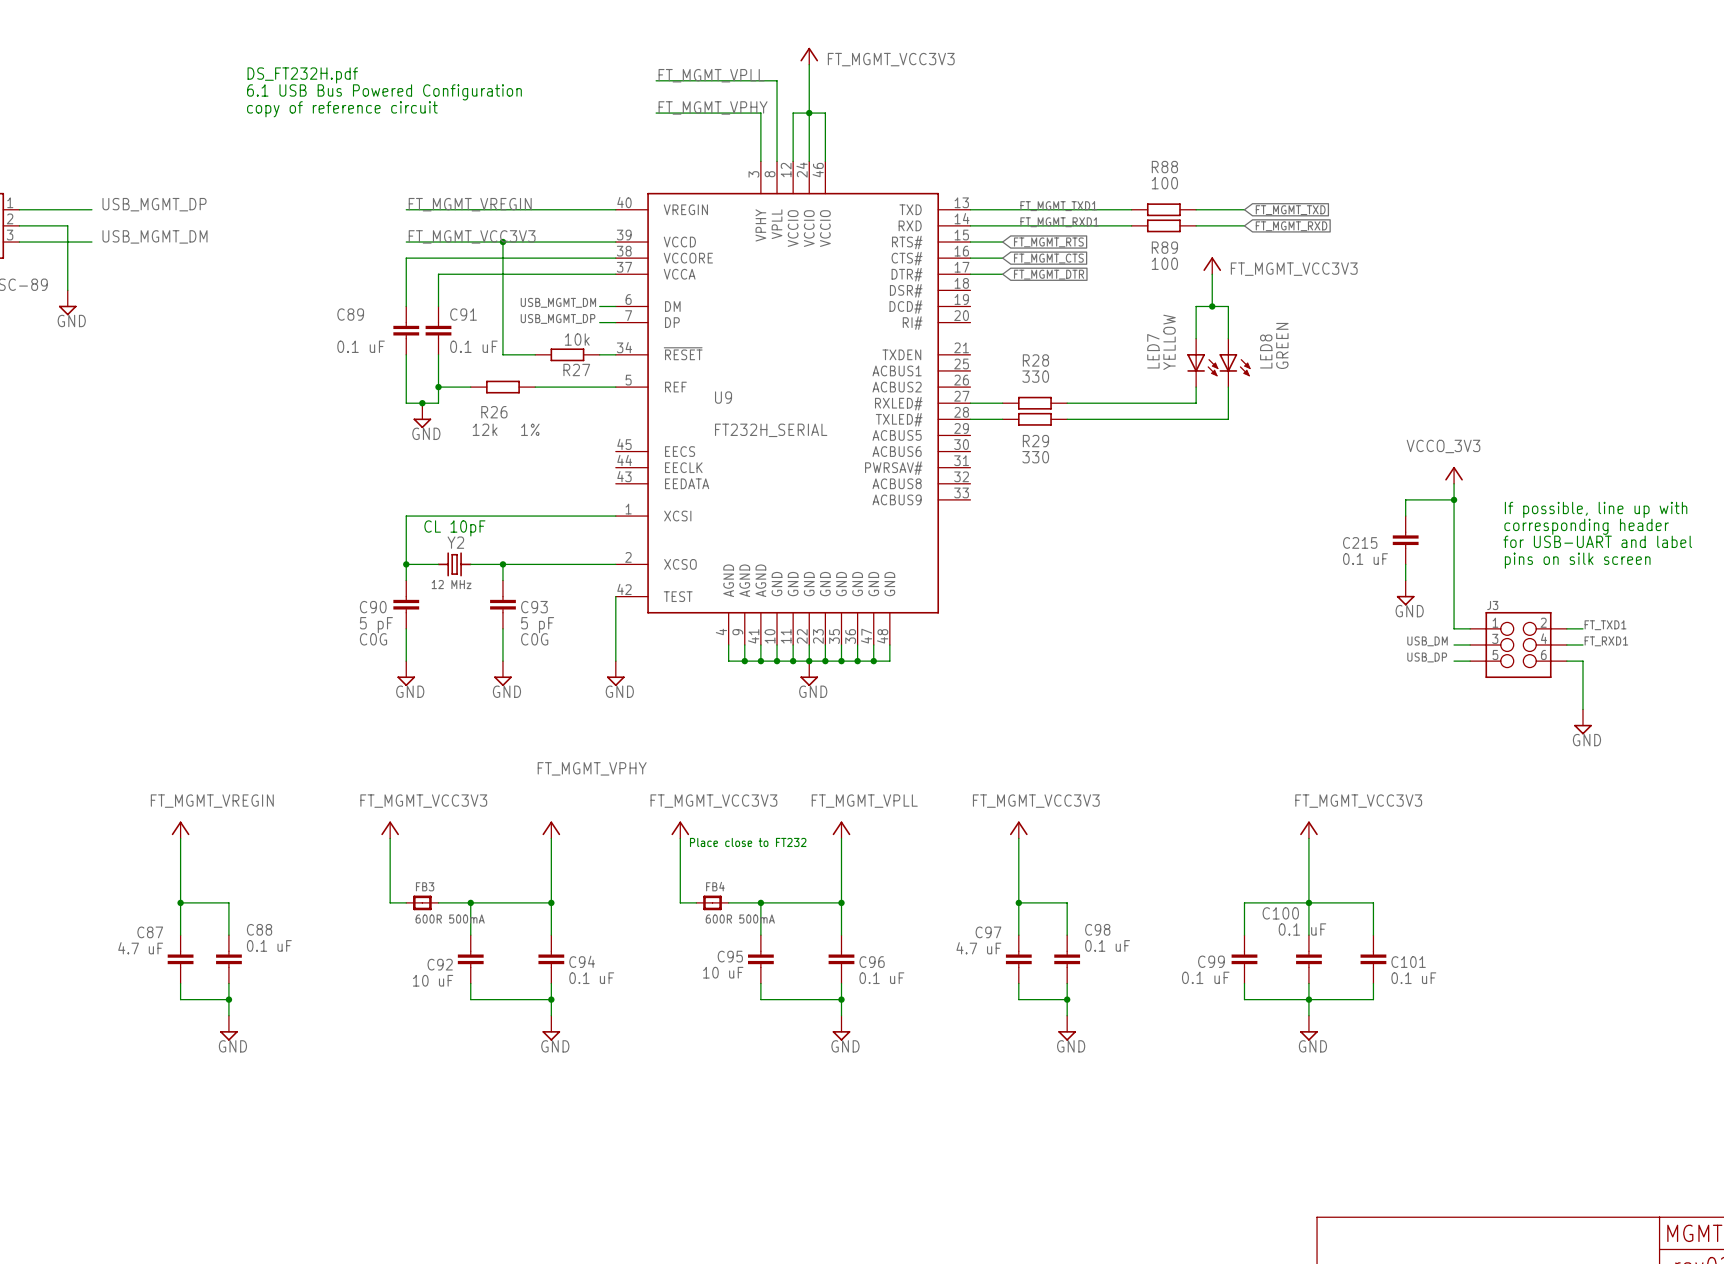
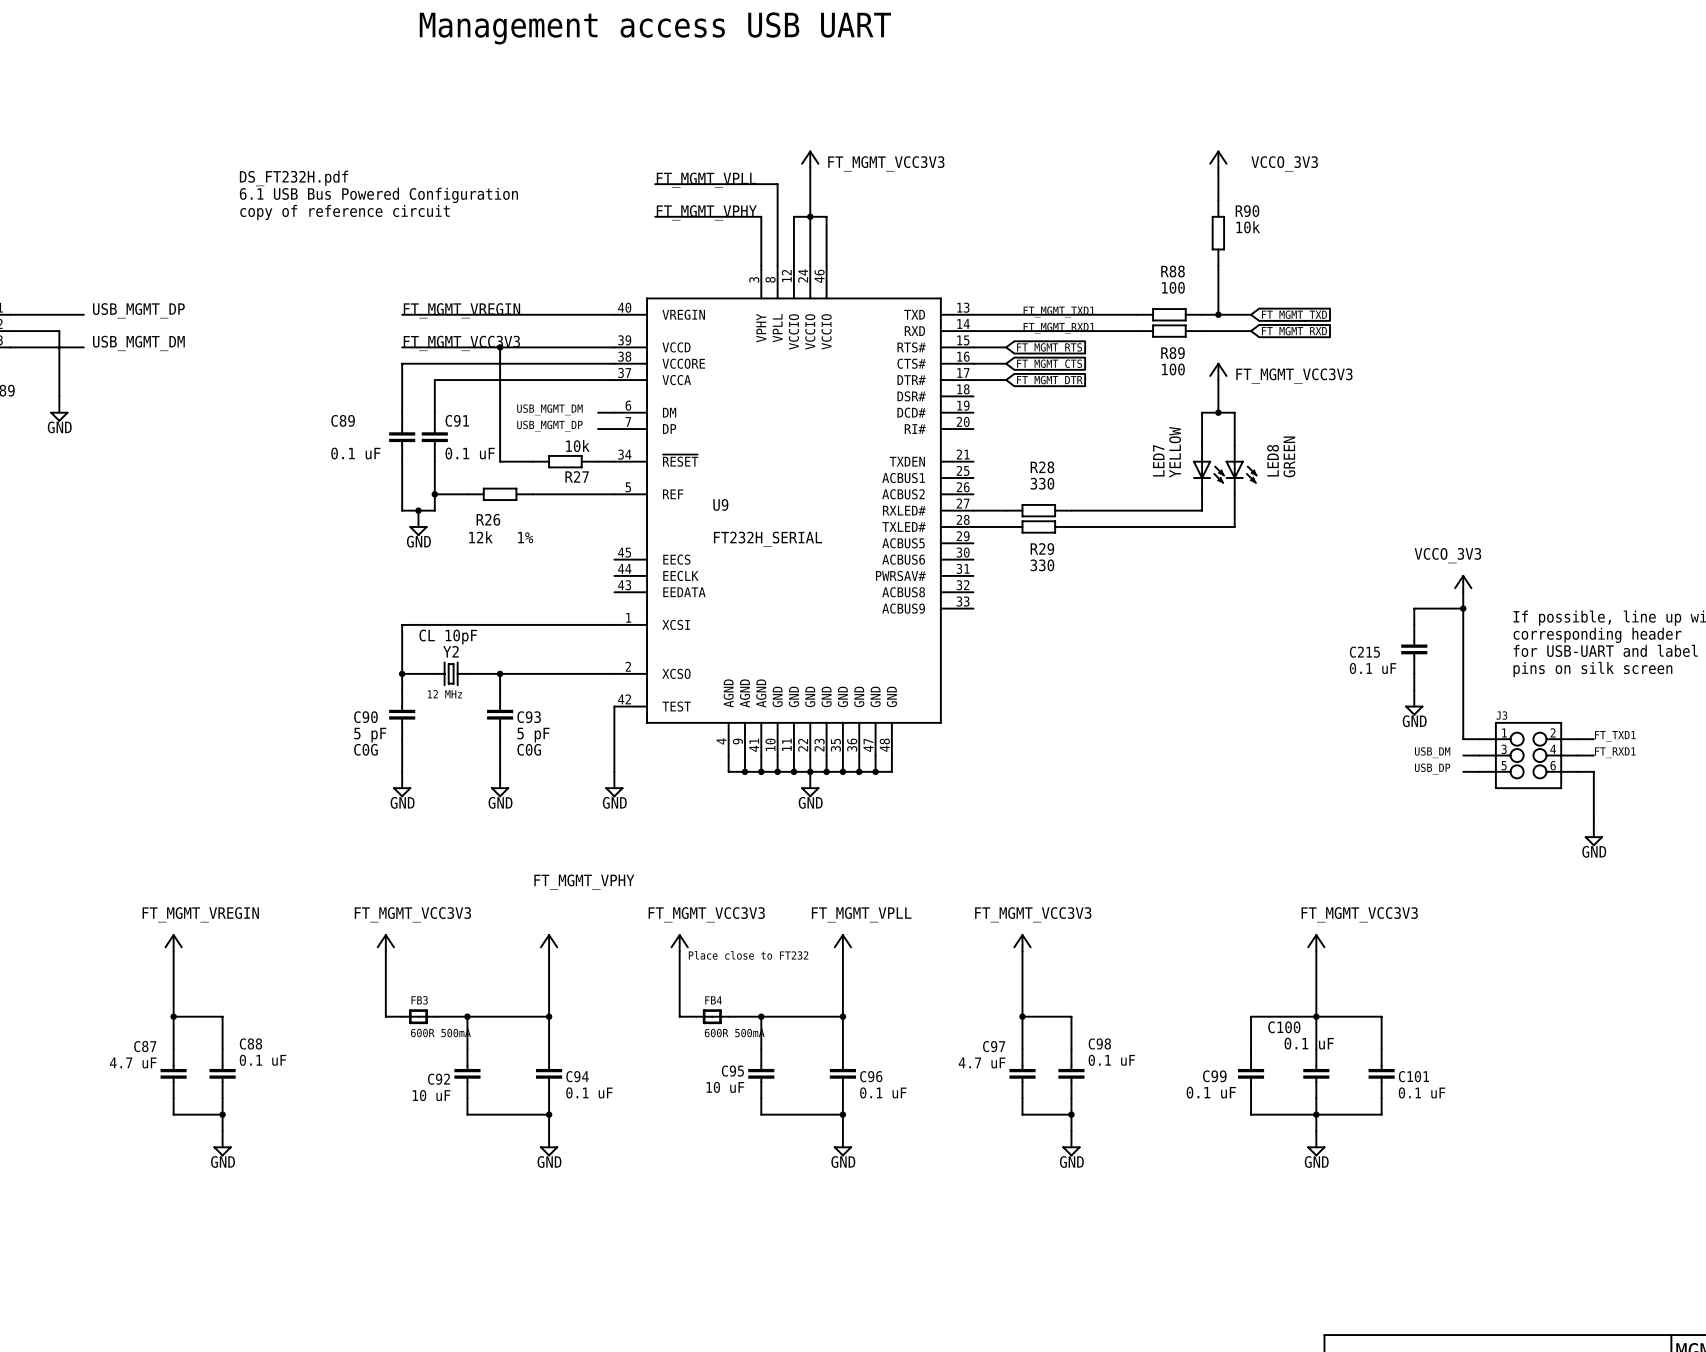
power symbol: none -> (1218, 159)
label: none -> VCCO_3V3 (1284, 163)
wire: none -> (1218, 167) (1218, 200)
R90: none -> 10k (1218, 233)
wire: none -> (1218, 265) (1218, 314)
junction: none -> (1218, 314)

